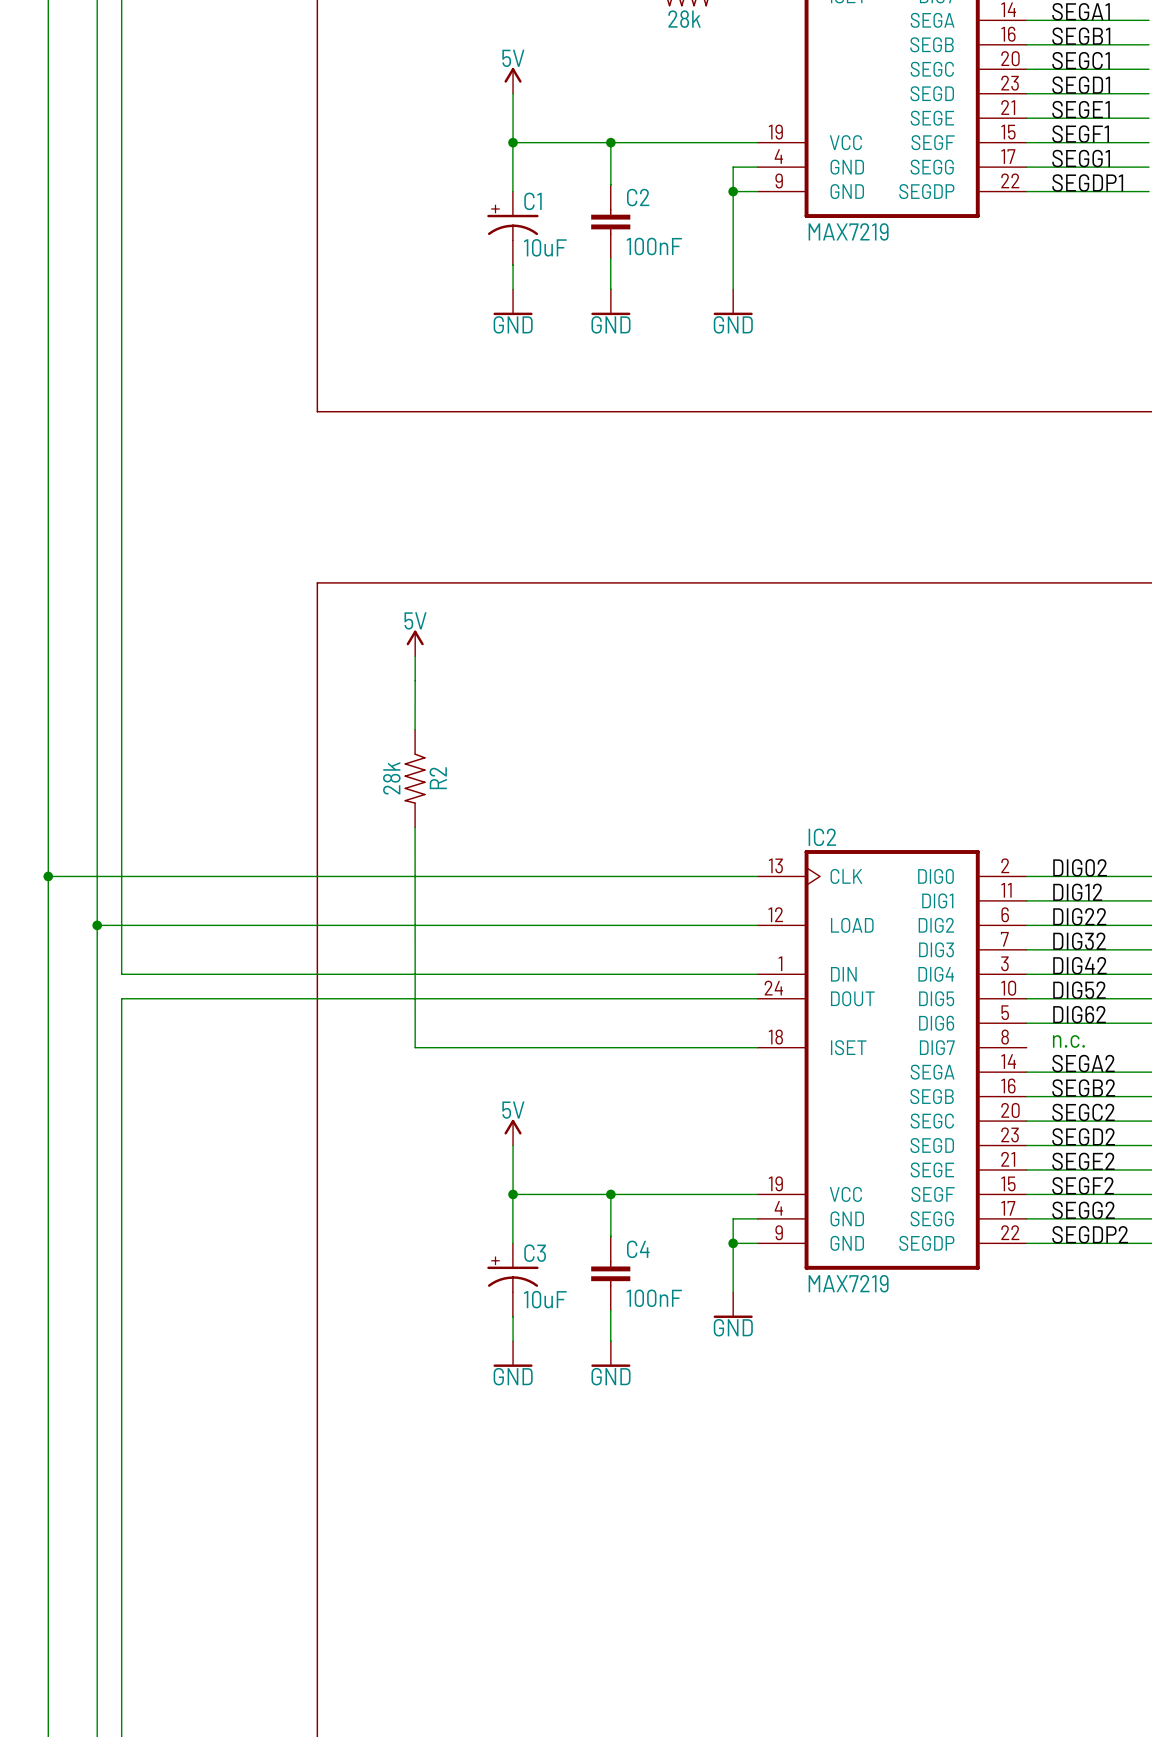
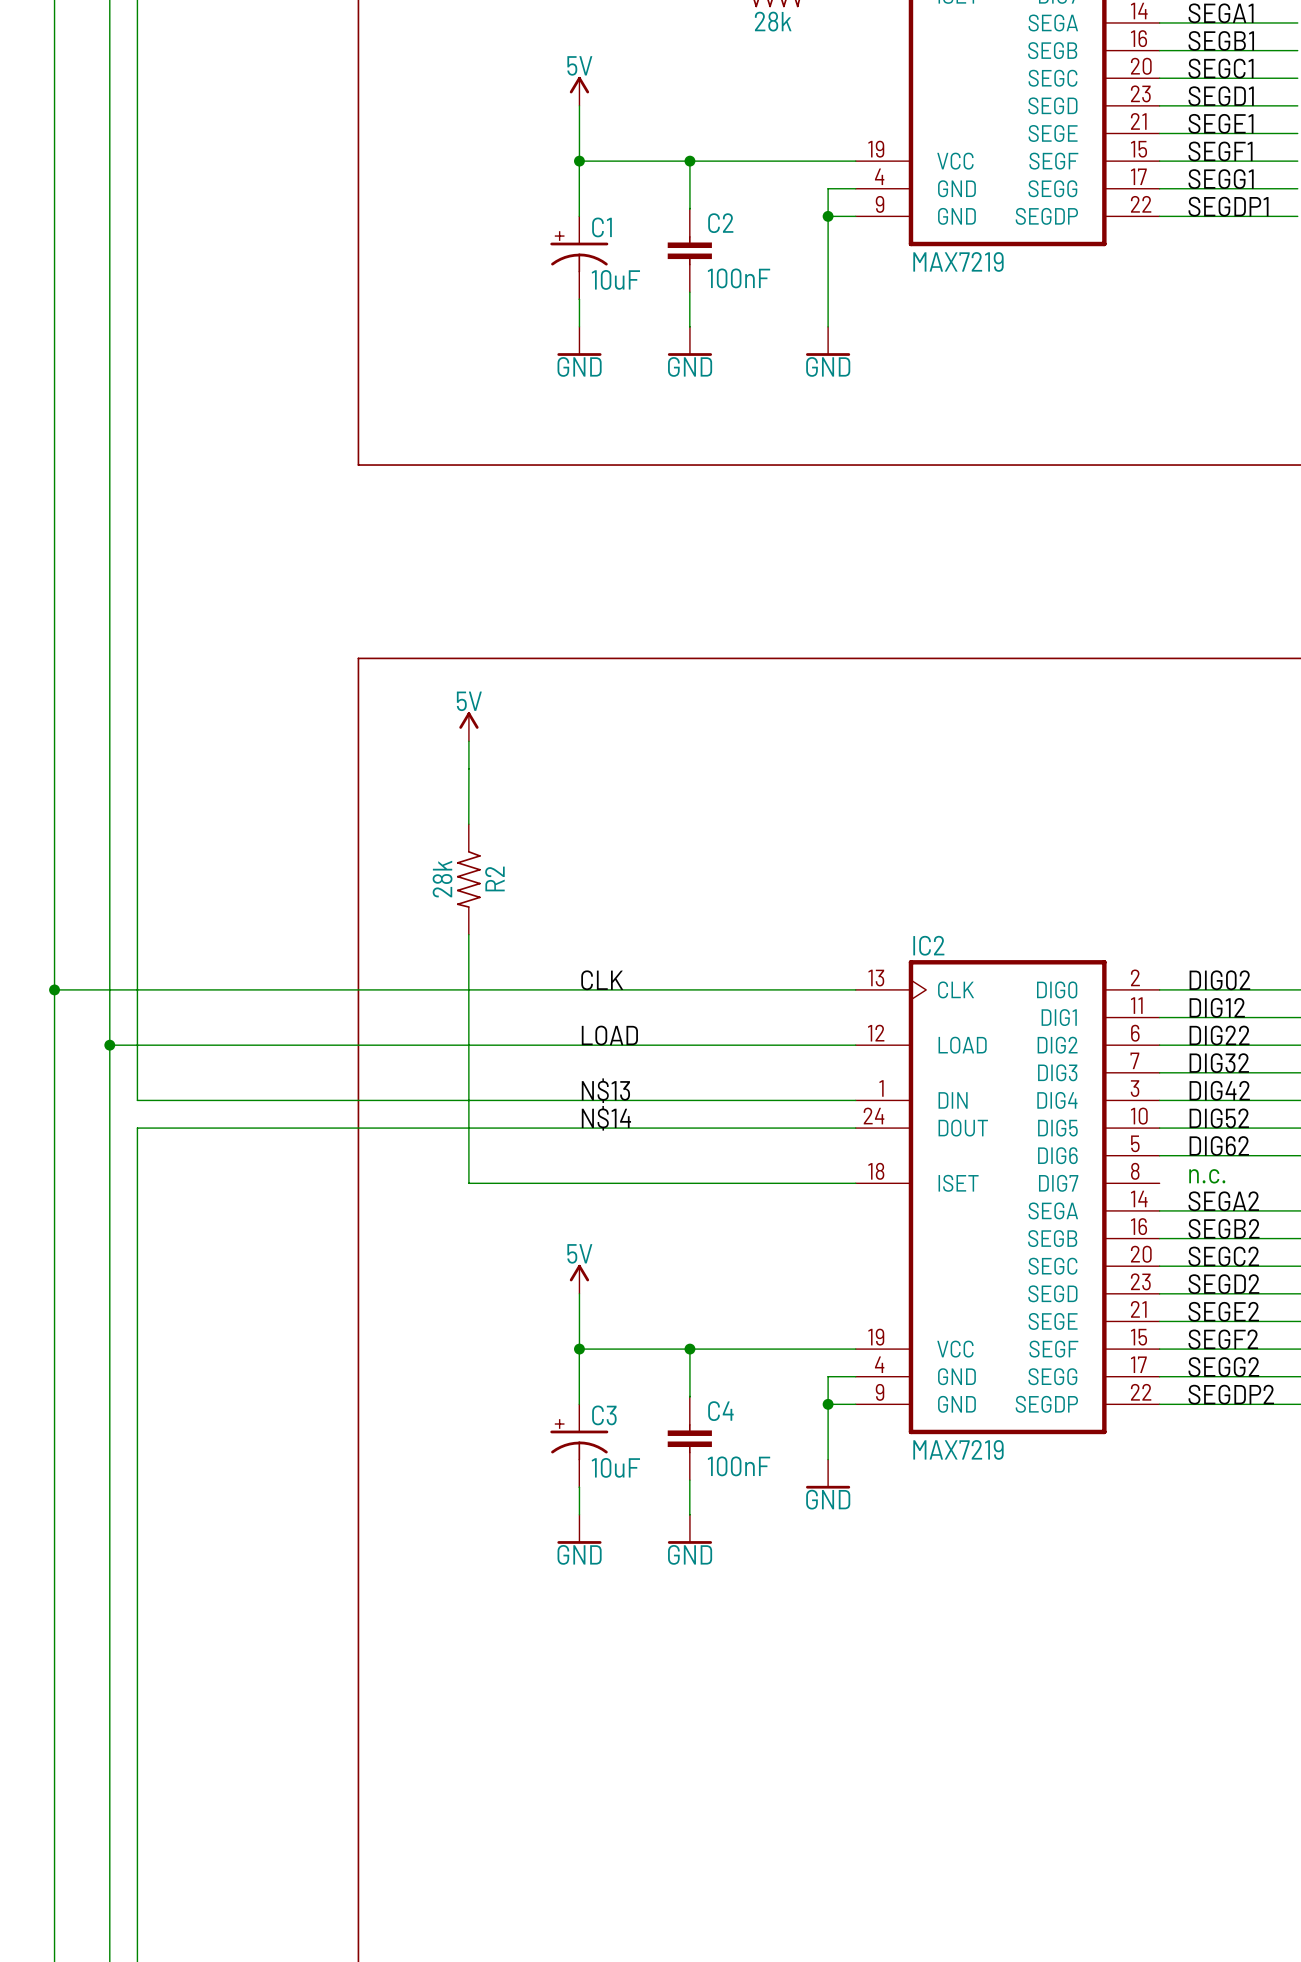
label: none -> CLK (602, 980)
label: none -> LOAD (609, 1035)
label: none -> N$13 (605, 1090)
label: none -> N$14 (606, 1118)

